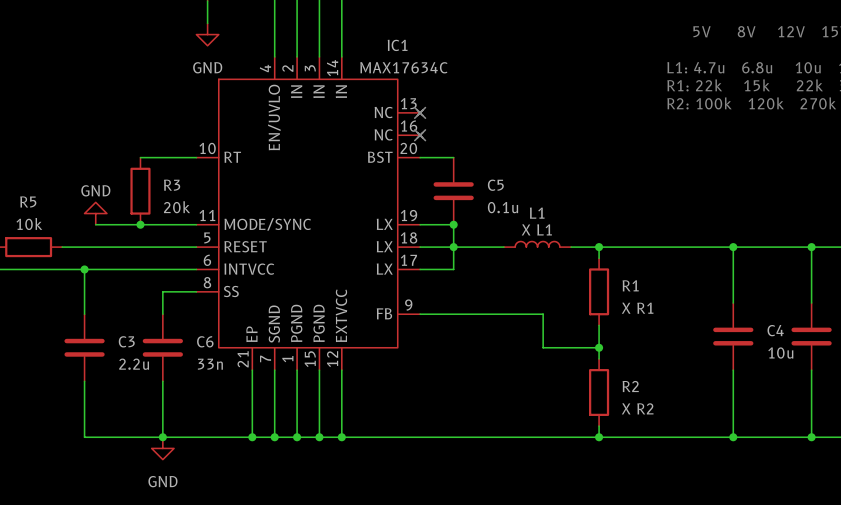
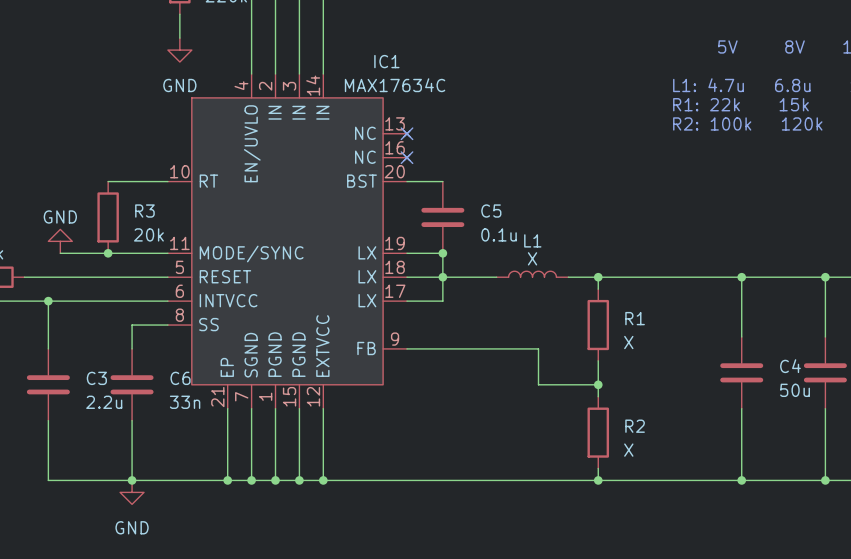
L1 value: X L1 (536, 229) -> X (532, 258)
R1 value: X R1 (637, 308) -> X (628, 342)
C4 value: 10u (780, 353) -> 50u (795, 390)
R2 value: X R2 (637, 408) -> X (628, 450)

